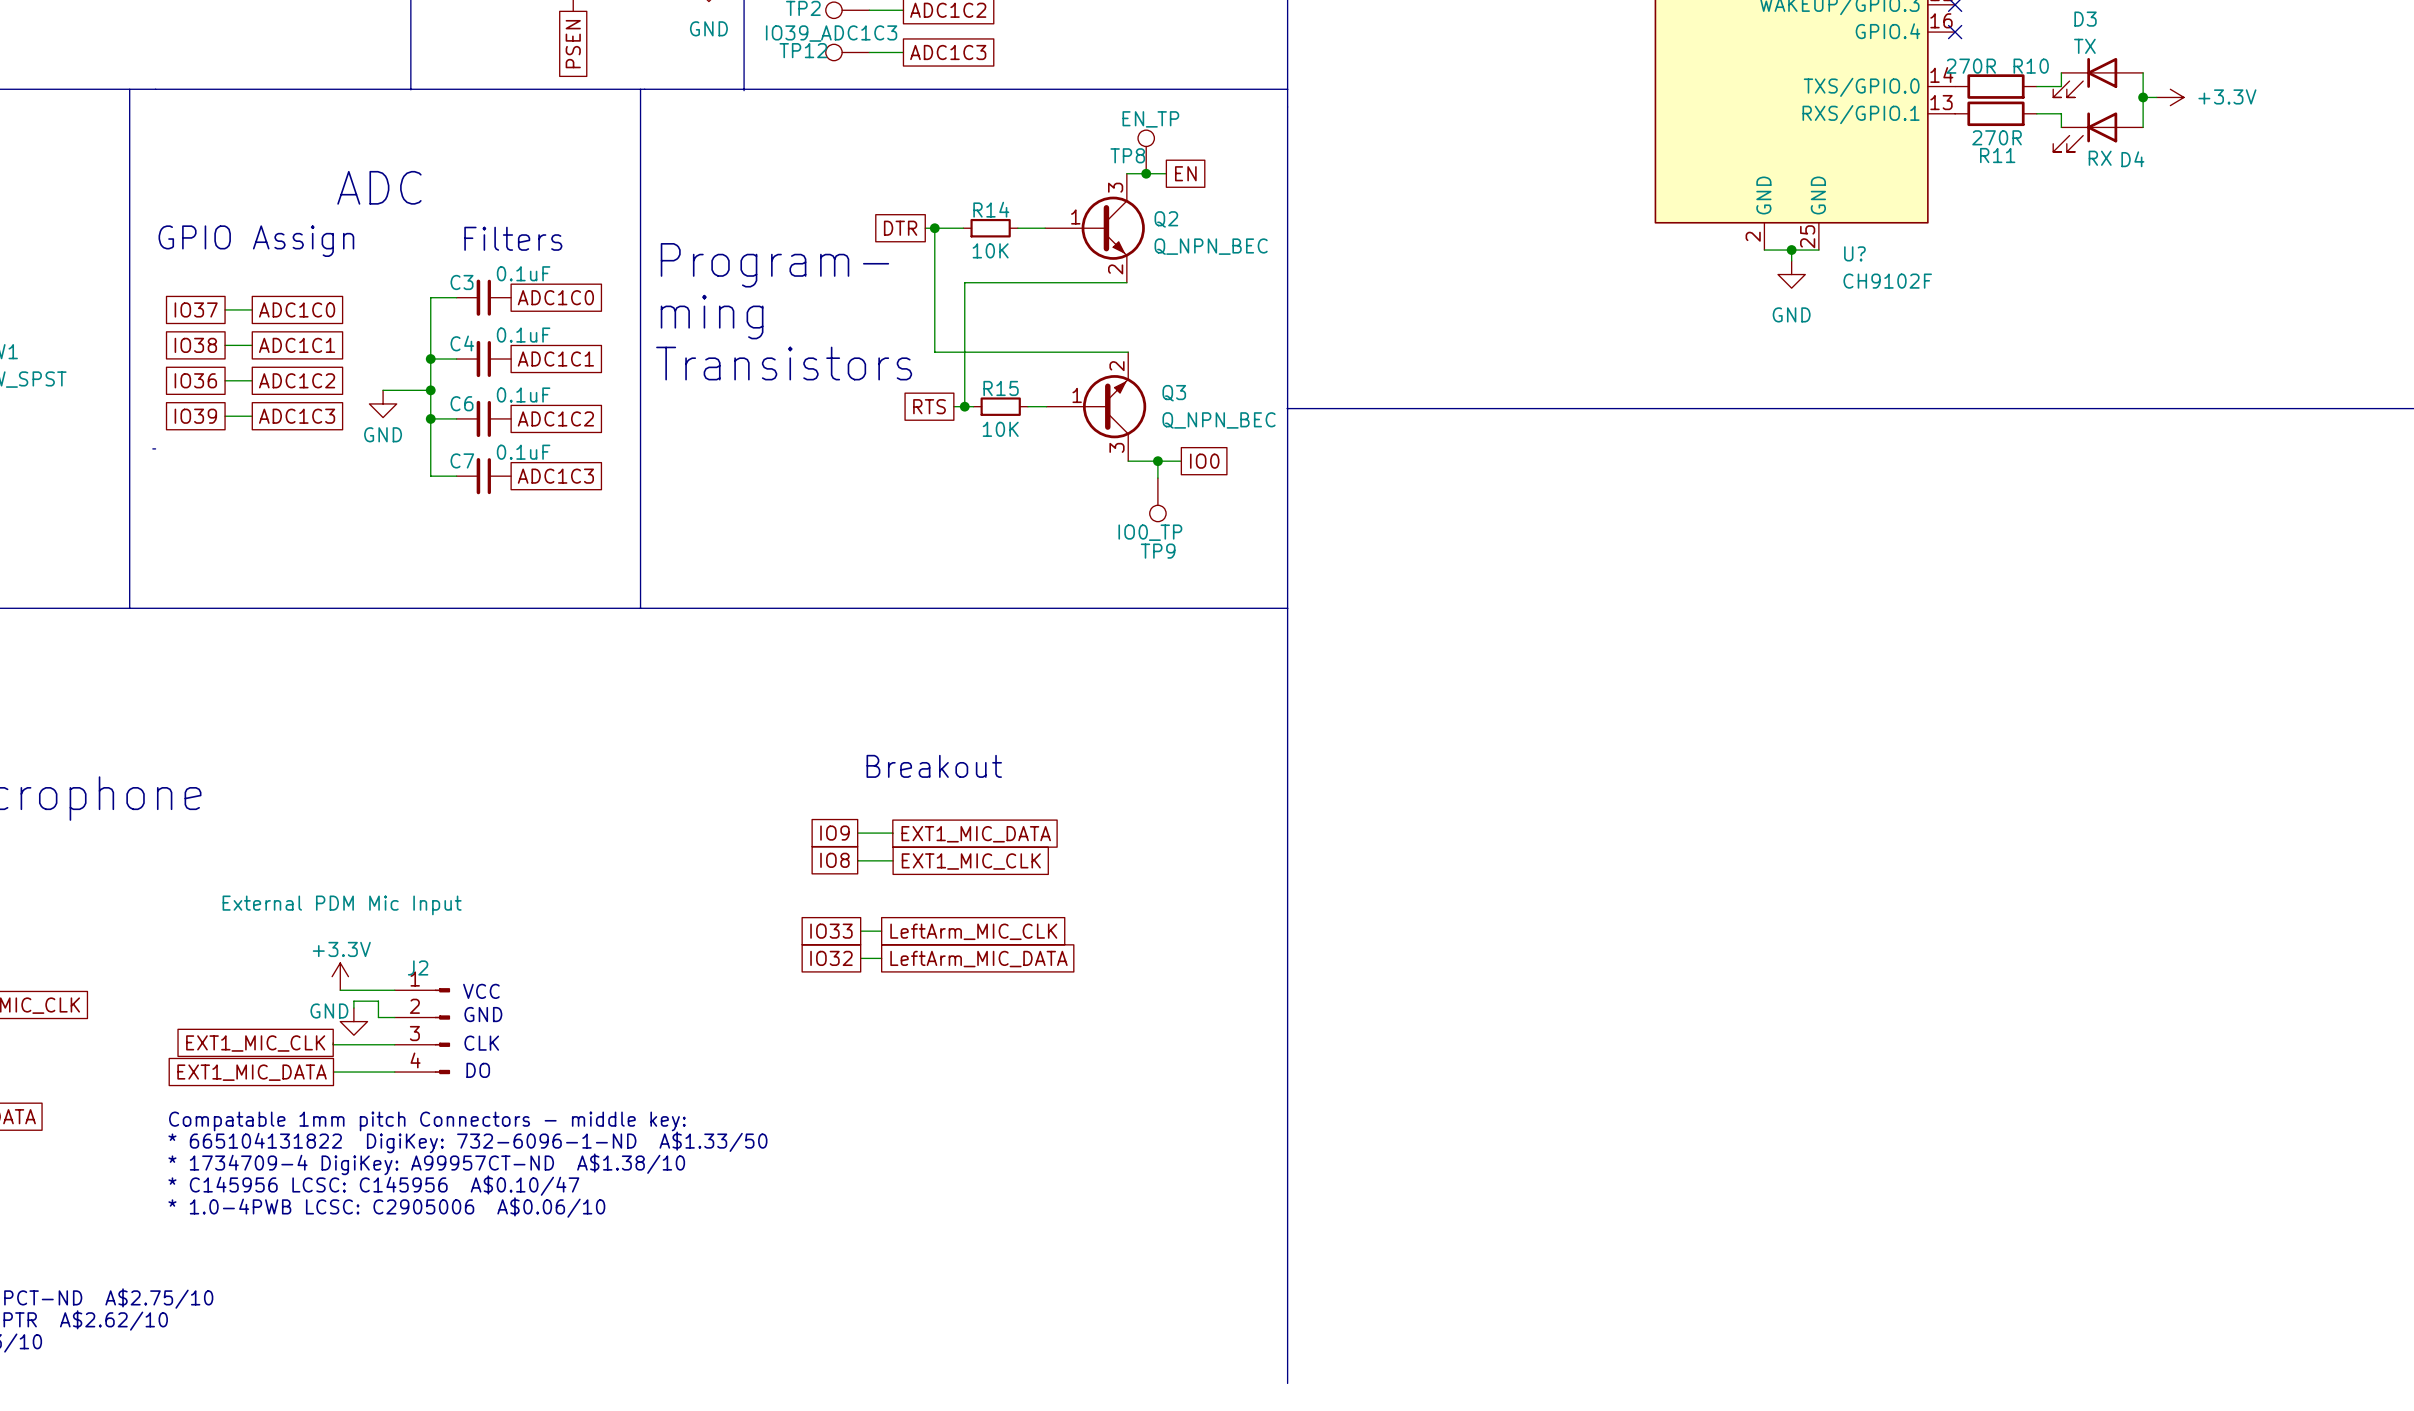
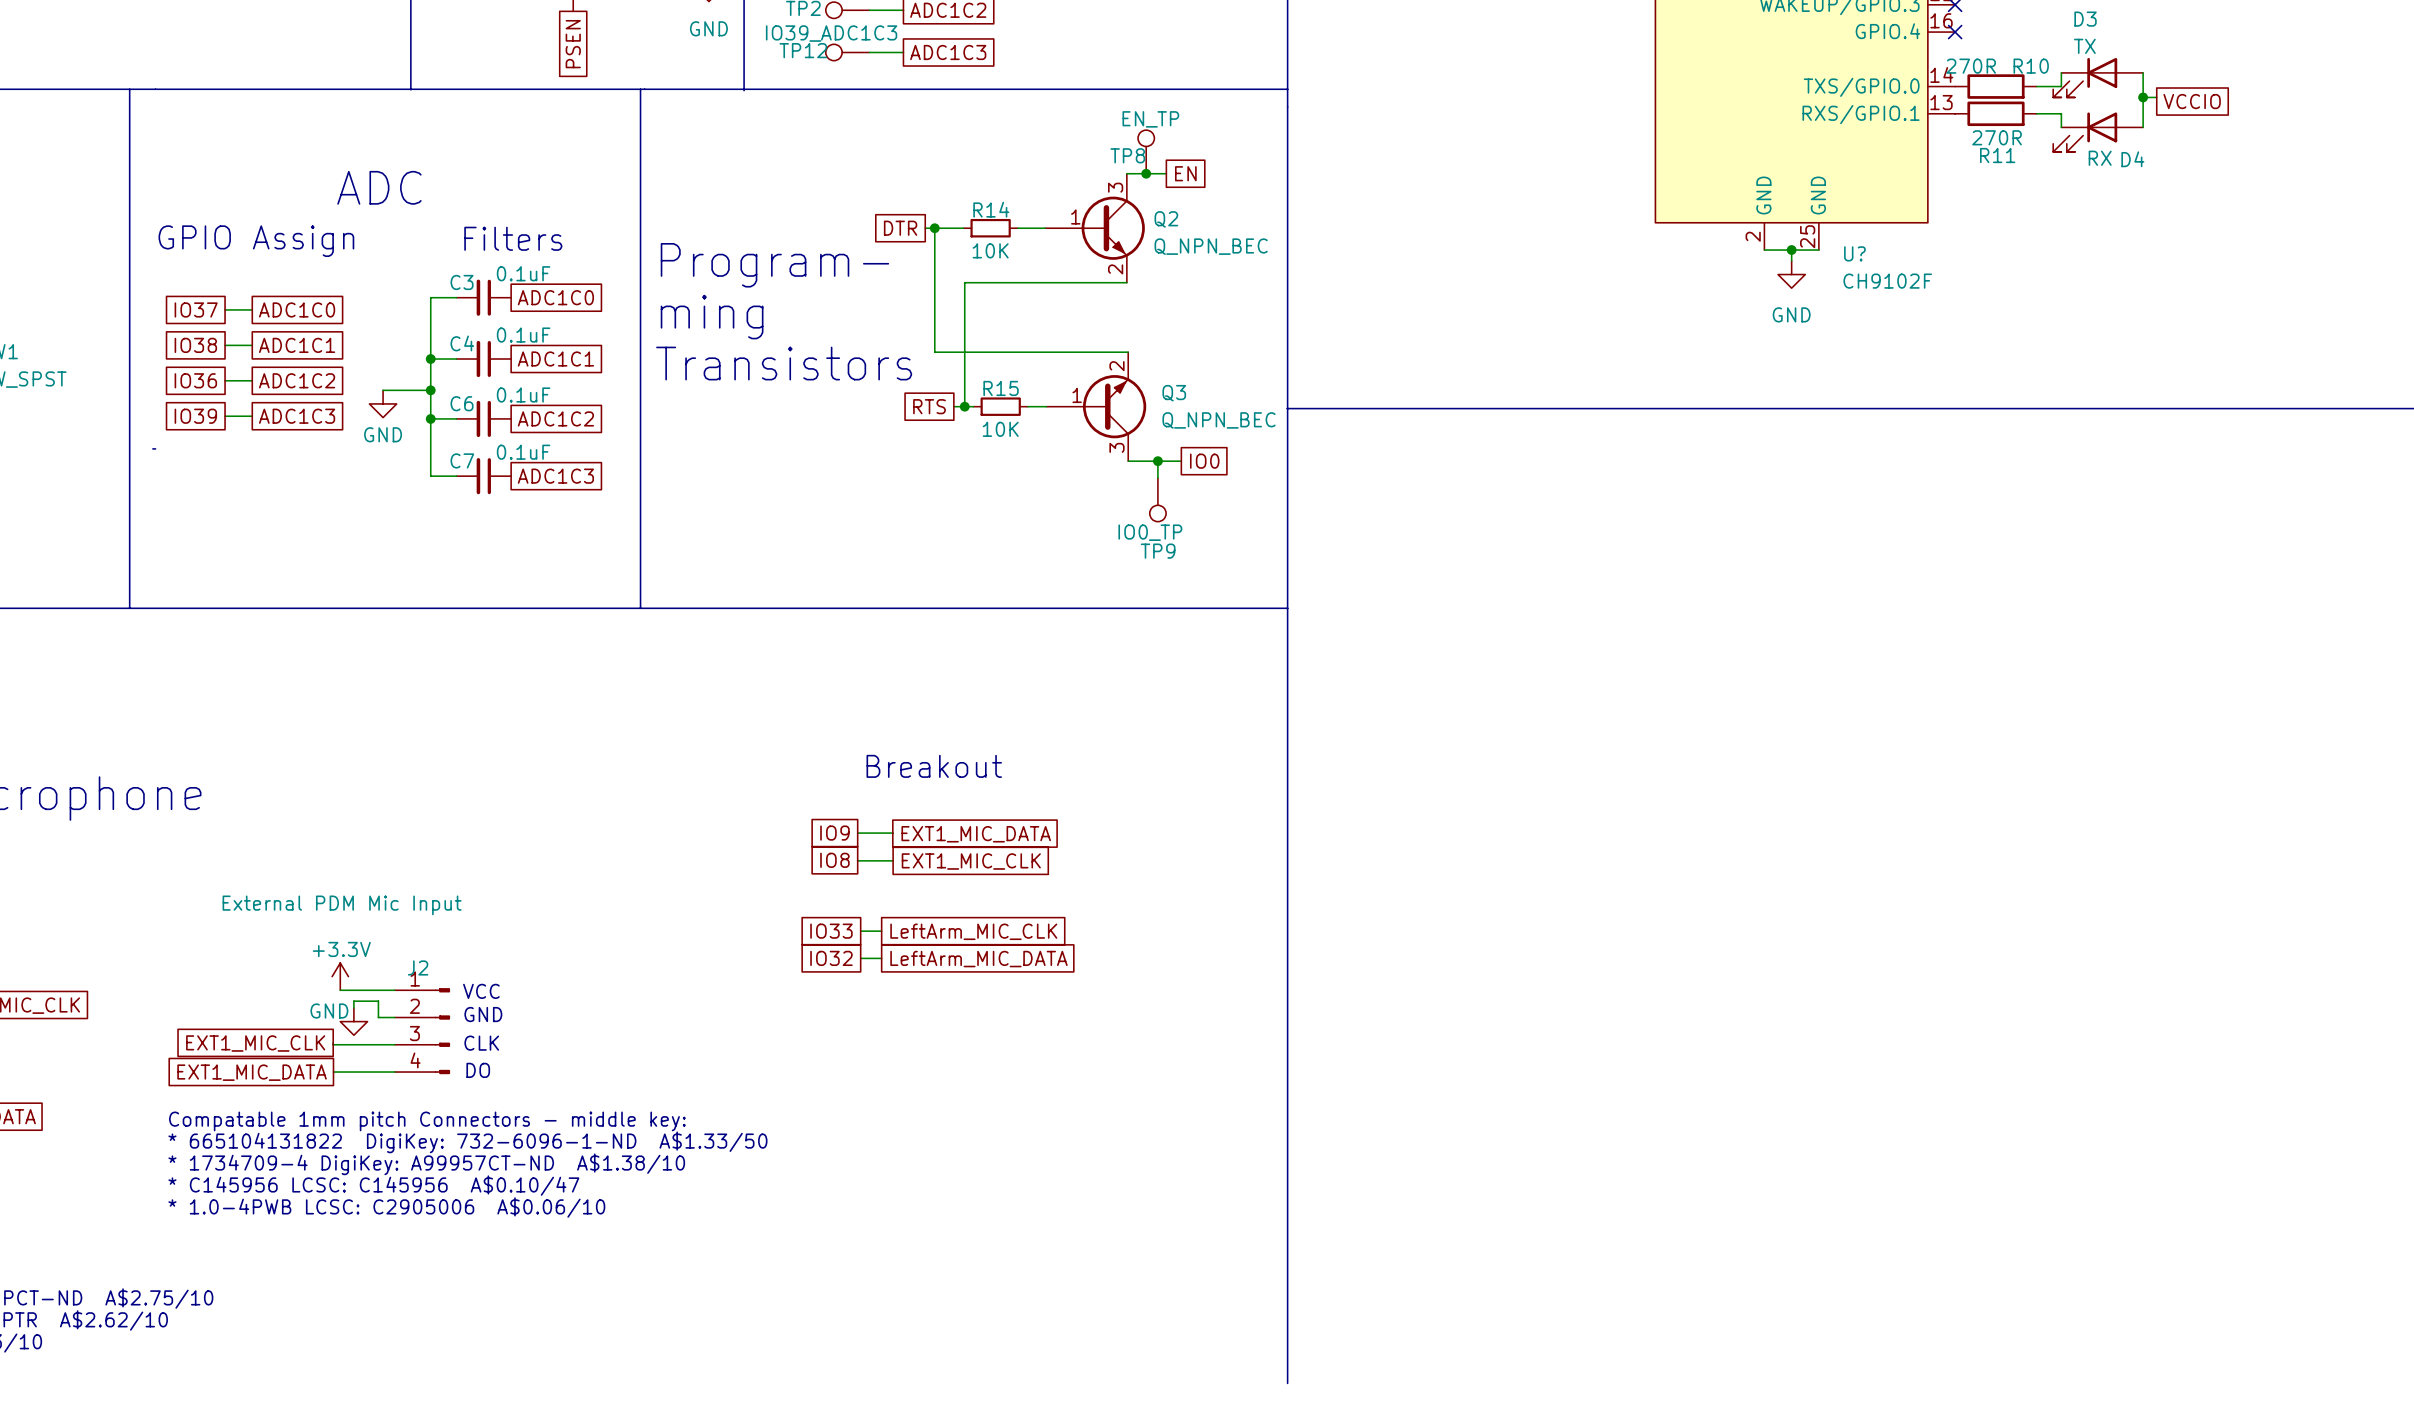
power symbol: +3.3V (2170, 97) -> none
global label: none -> VCCIO (2192, 101)

